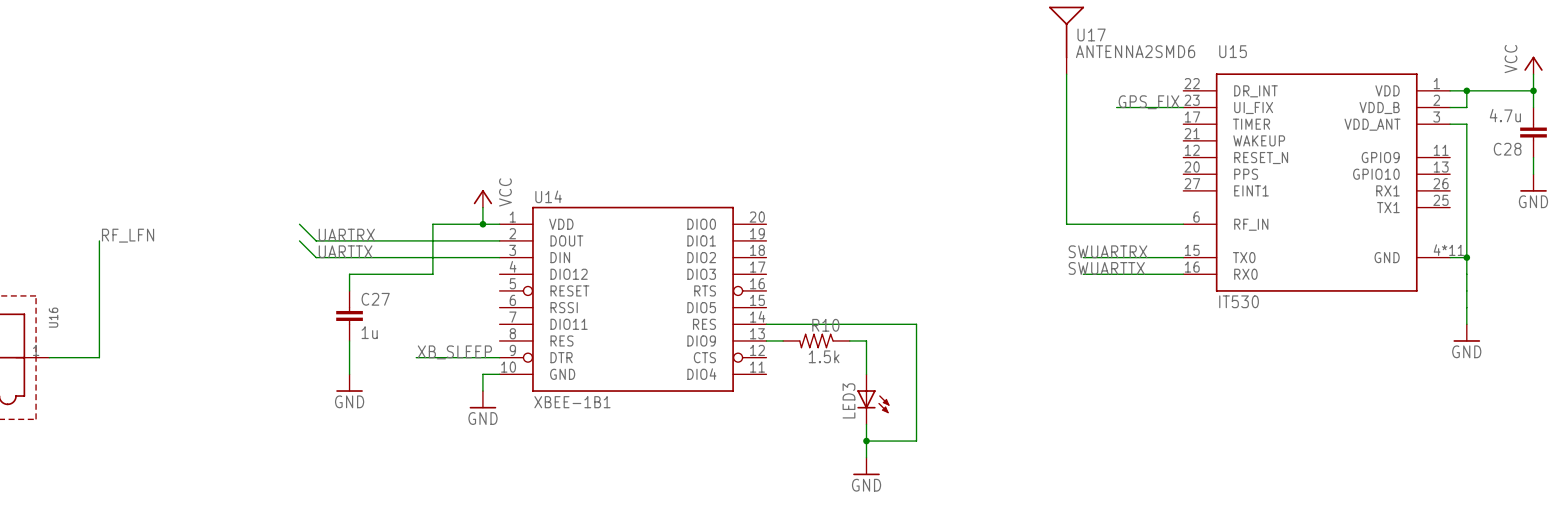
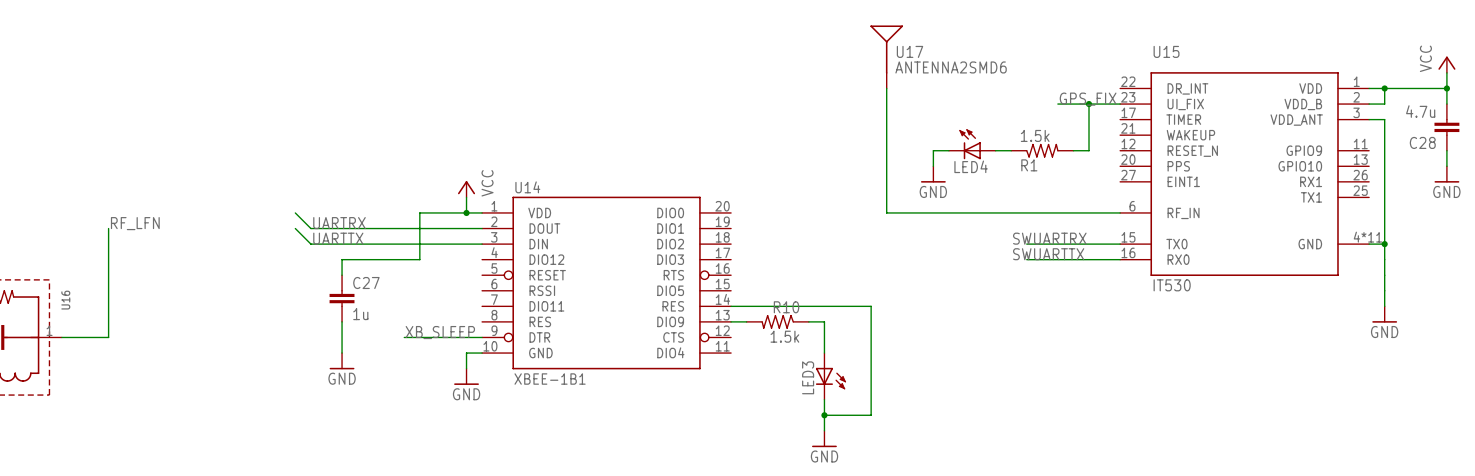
U17 position: (1066, 40) -> (886, 56)
wire: (1066, 74) (1066, 224) -> (886, 88) (886, 212) (1011, 212)
wire: none -> (1089, 104) (1089, 150) (1073, 150)
junction: none -> (1089, 104)
LED4: none -> (972, 144)
wire: none -> (948, 150) (933, 150) (933, 166)
wire: none -> (995, 150) (1011, 150)
R1: none -> 1.5k (1042, 150)
power symbol: none -> GND (933, 174)

